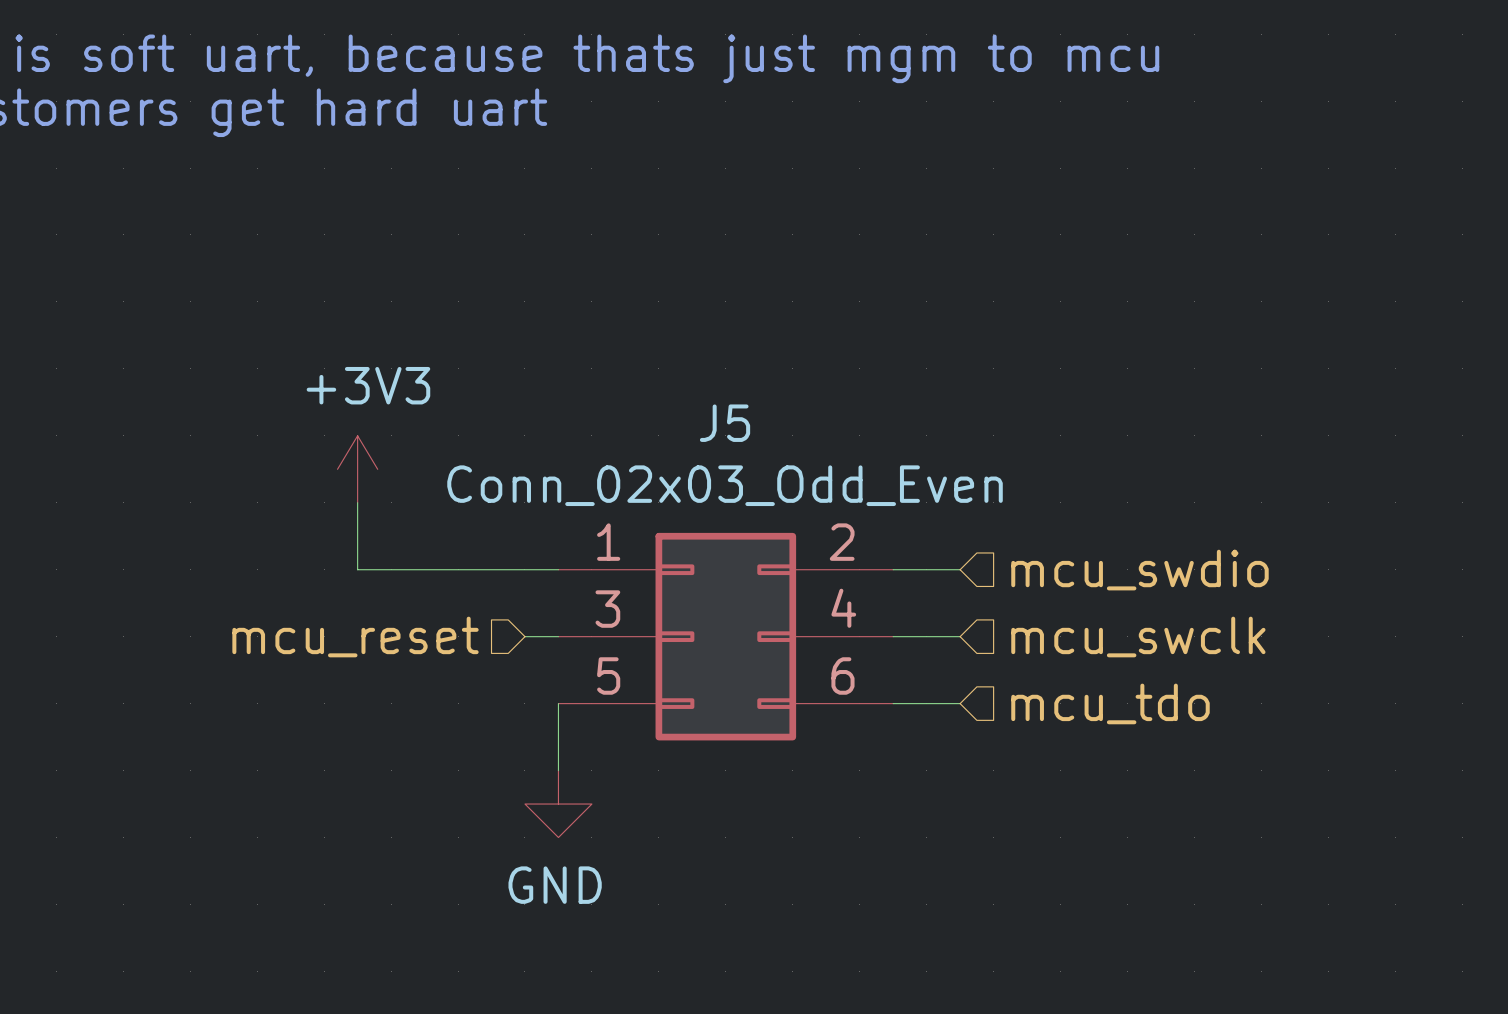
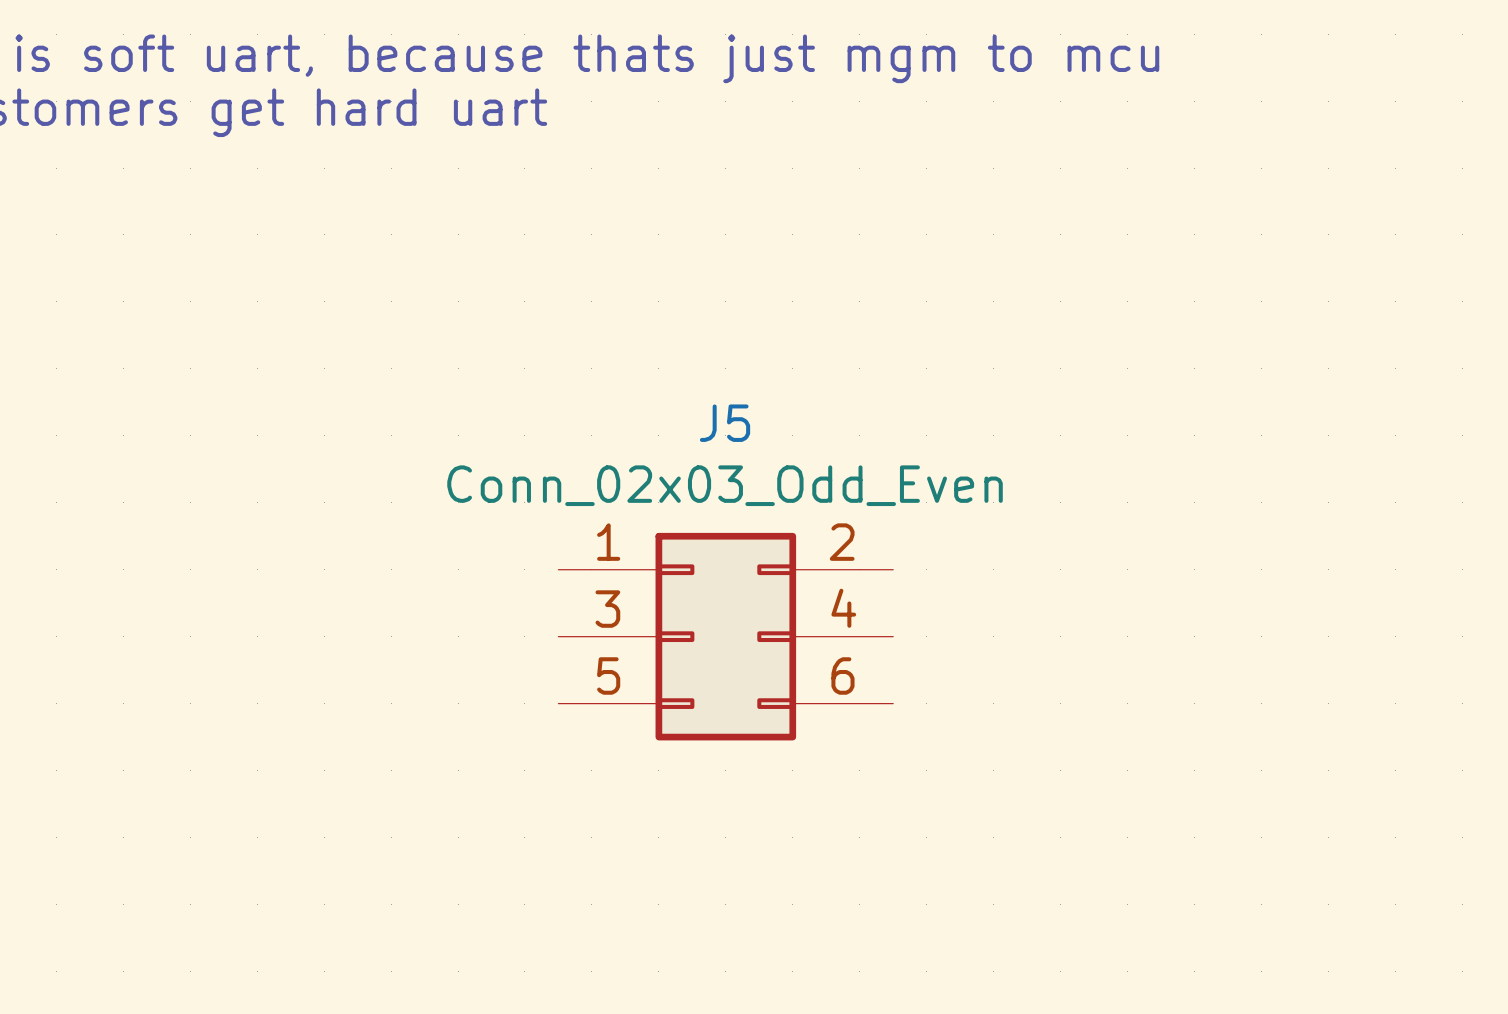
power symbol: +3V3 (357, 469) -> none
wire: (357, 502) (357, 569) (558, 569) -> none
wire: (893, 569) (960, 569) -> none
hierarchical label: mcu_swdio (1139, 570) -> none
wire: (524, 636) (558, 636) -> none
wire: (893, 636) (960, 636) -> none
hierarchical label: mcu_reset (355, 637) -> none
hierarchical label: mcu_swclk (1138, 637) -> none
wire: (558, 703) (558, 770) -> none
wire: (893, 703) (960, 703) -> none
hierarchical label: mcu_tdo (1110, 703) -> none
power symbol: GND (558, 804) -> none

